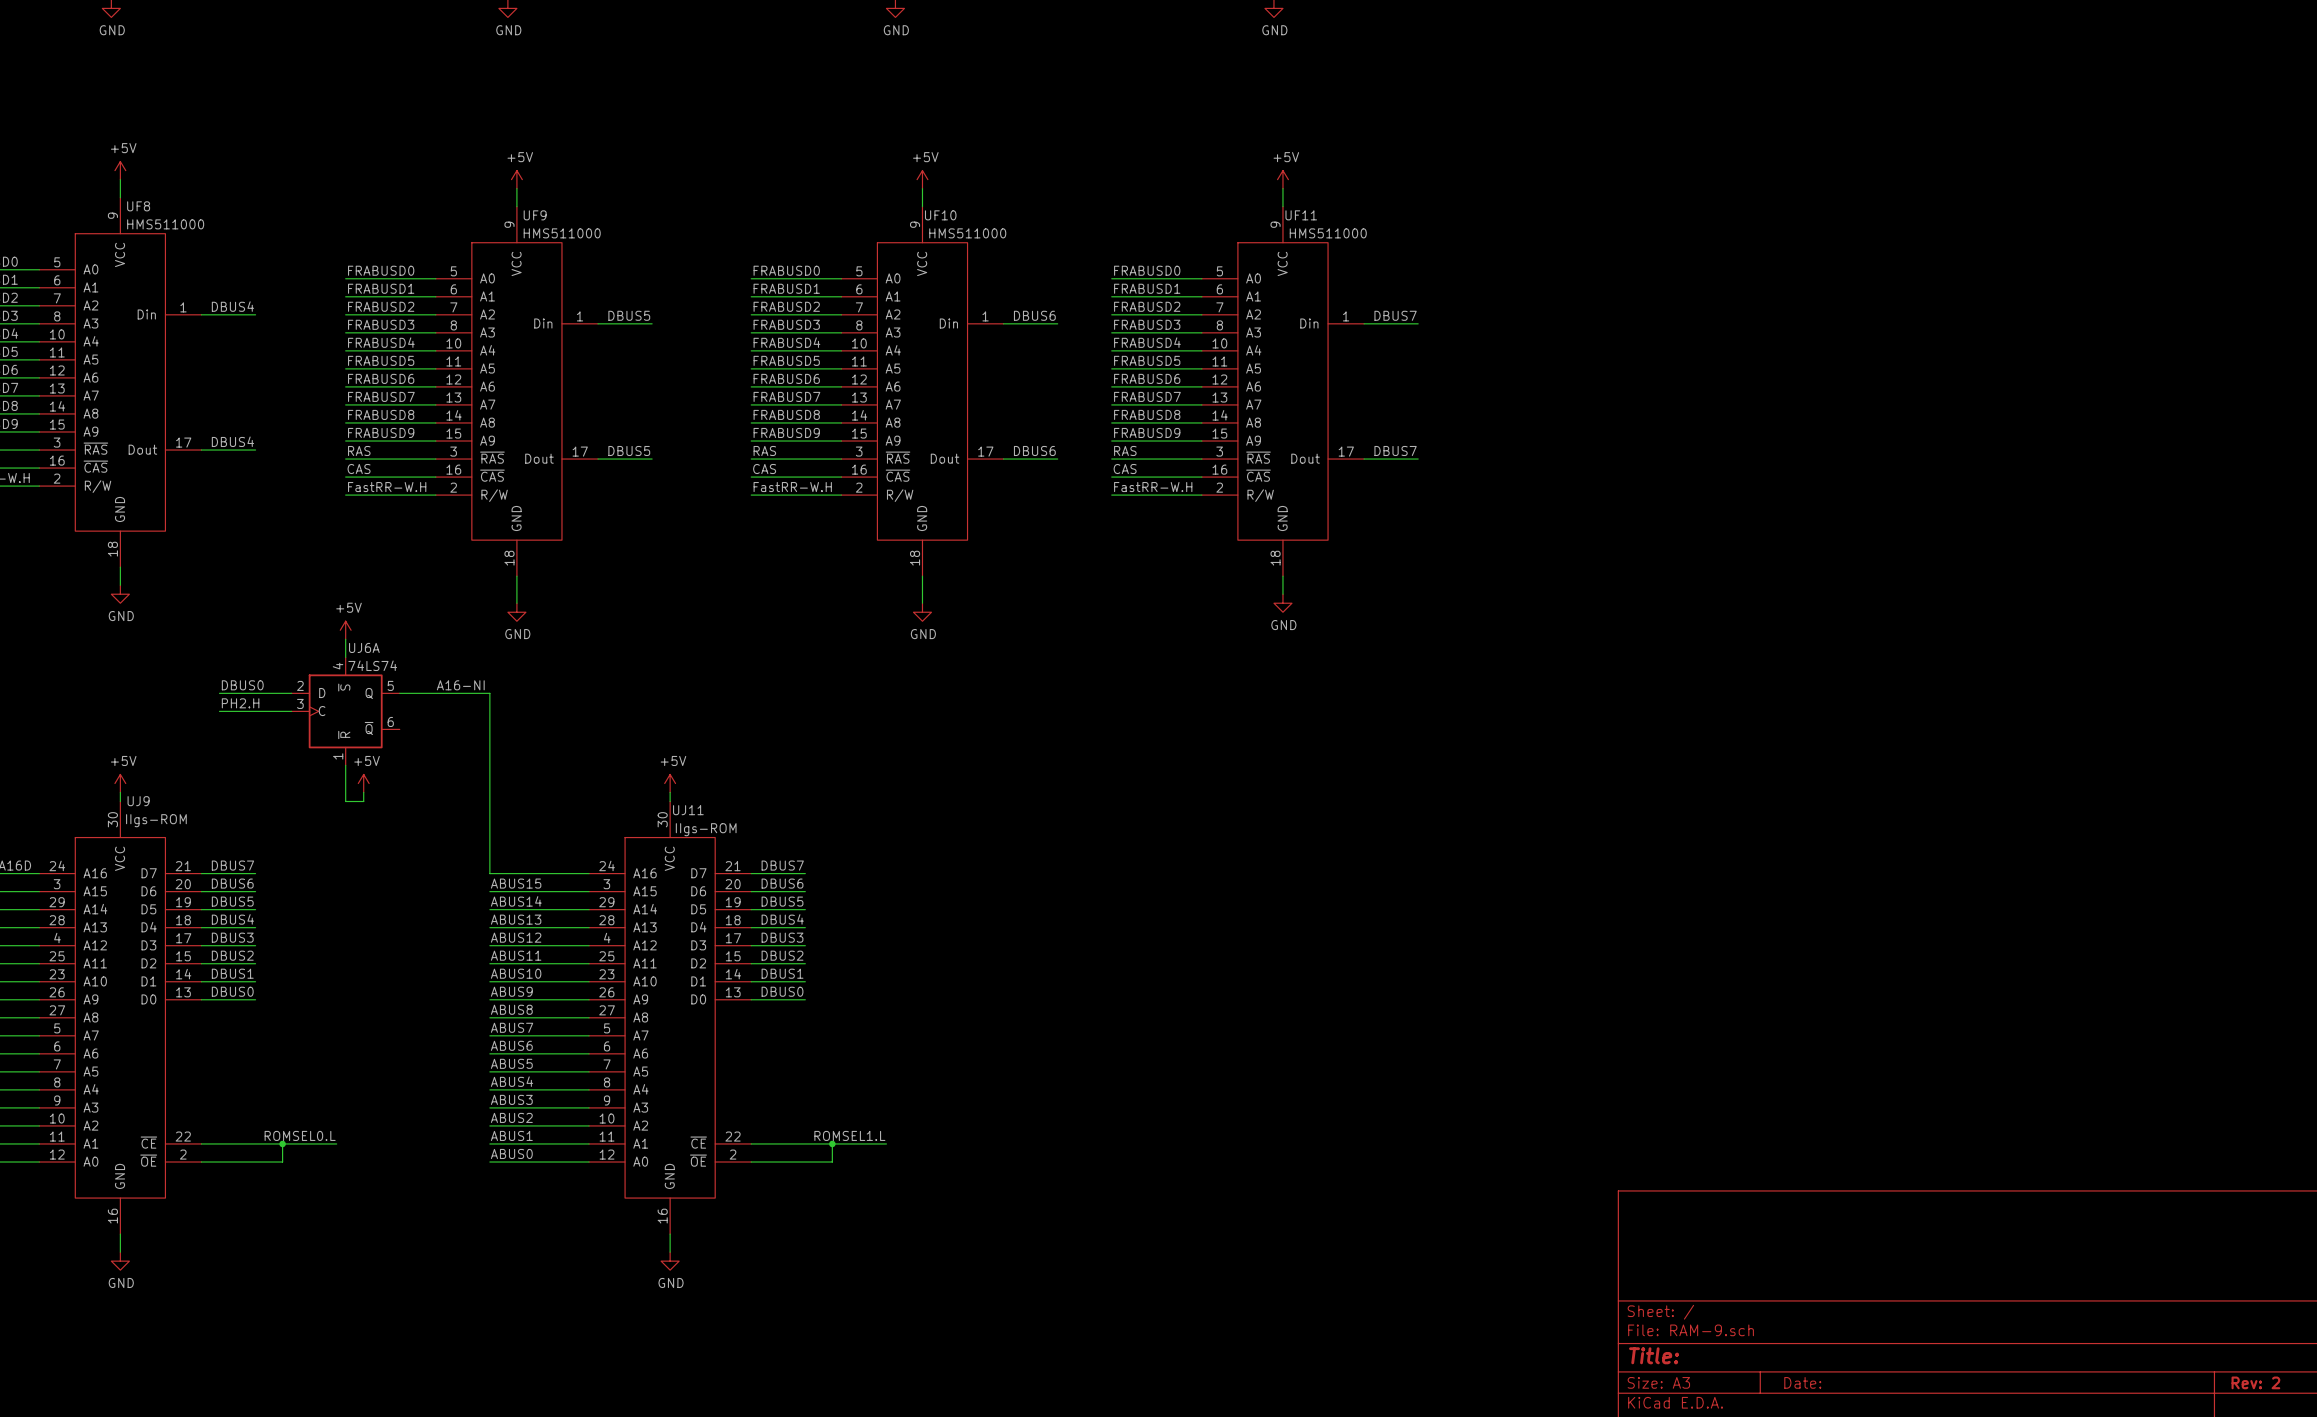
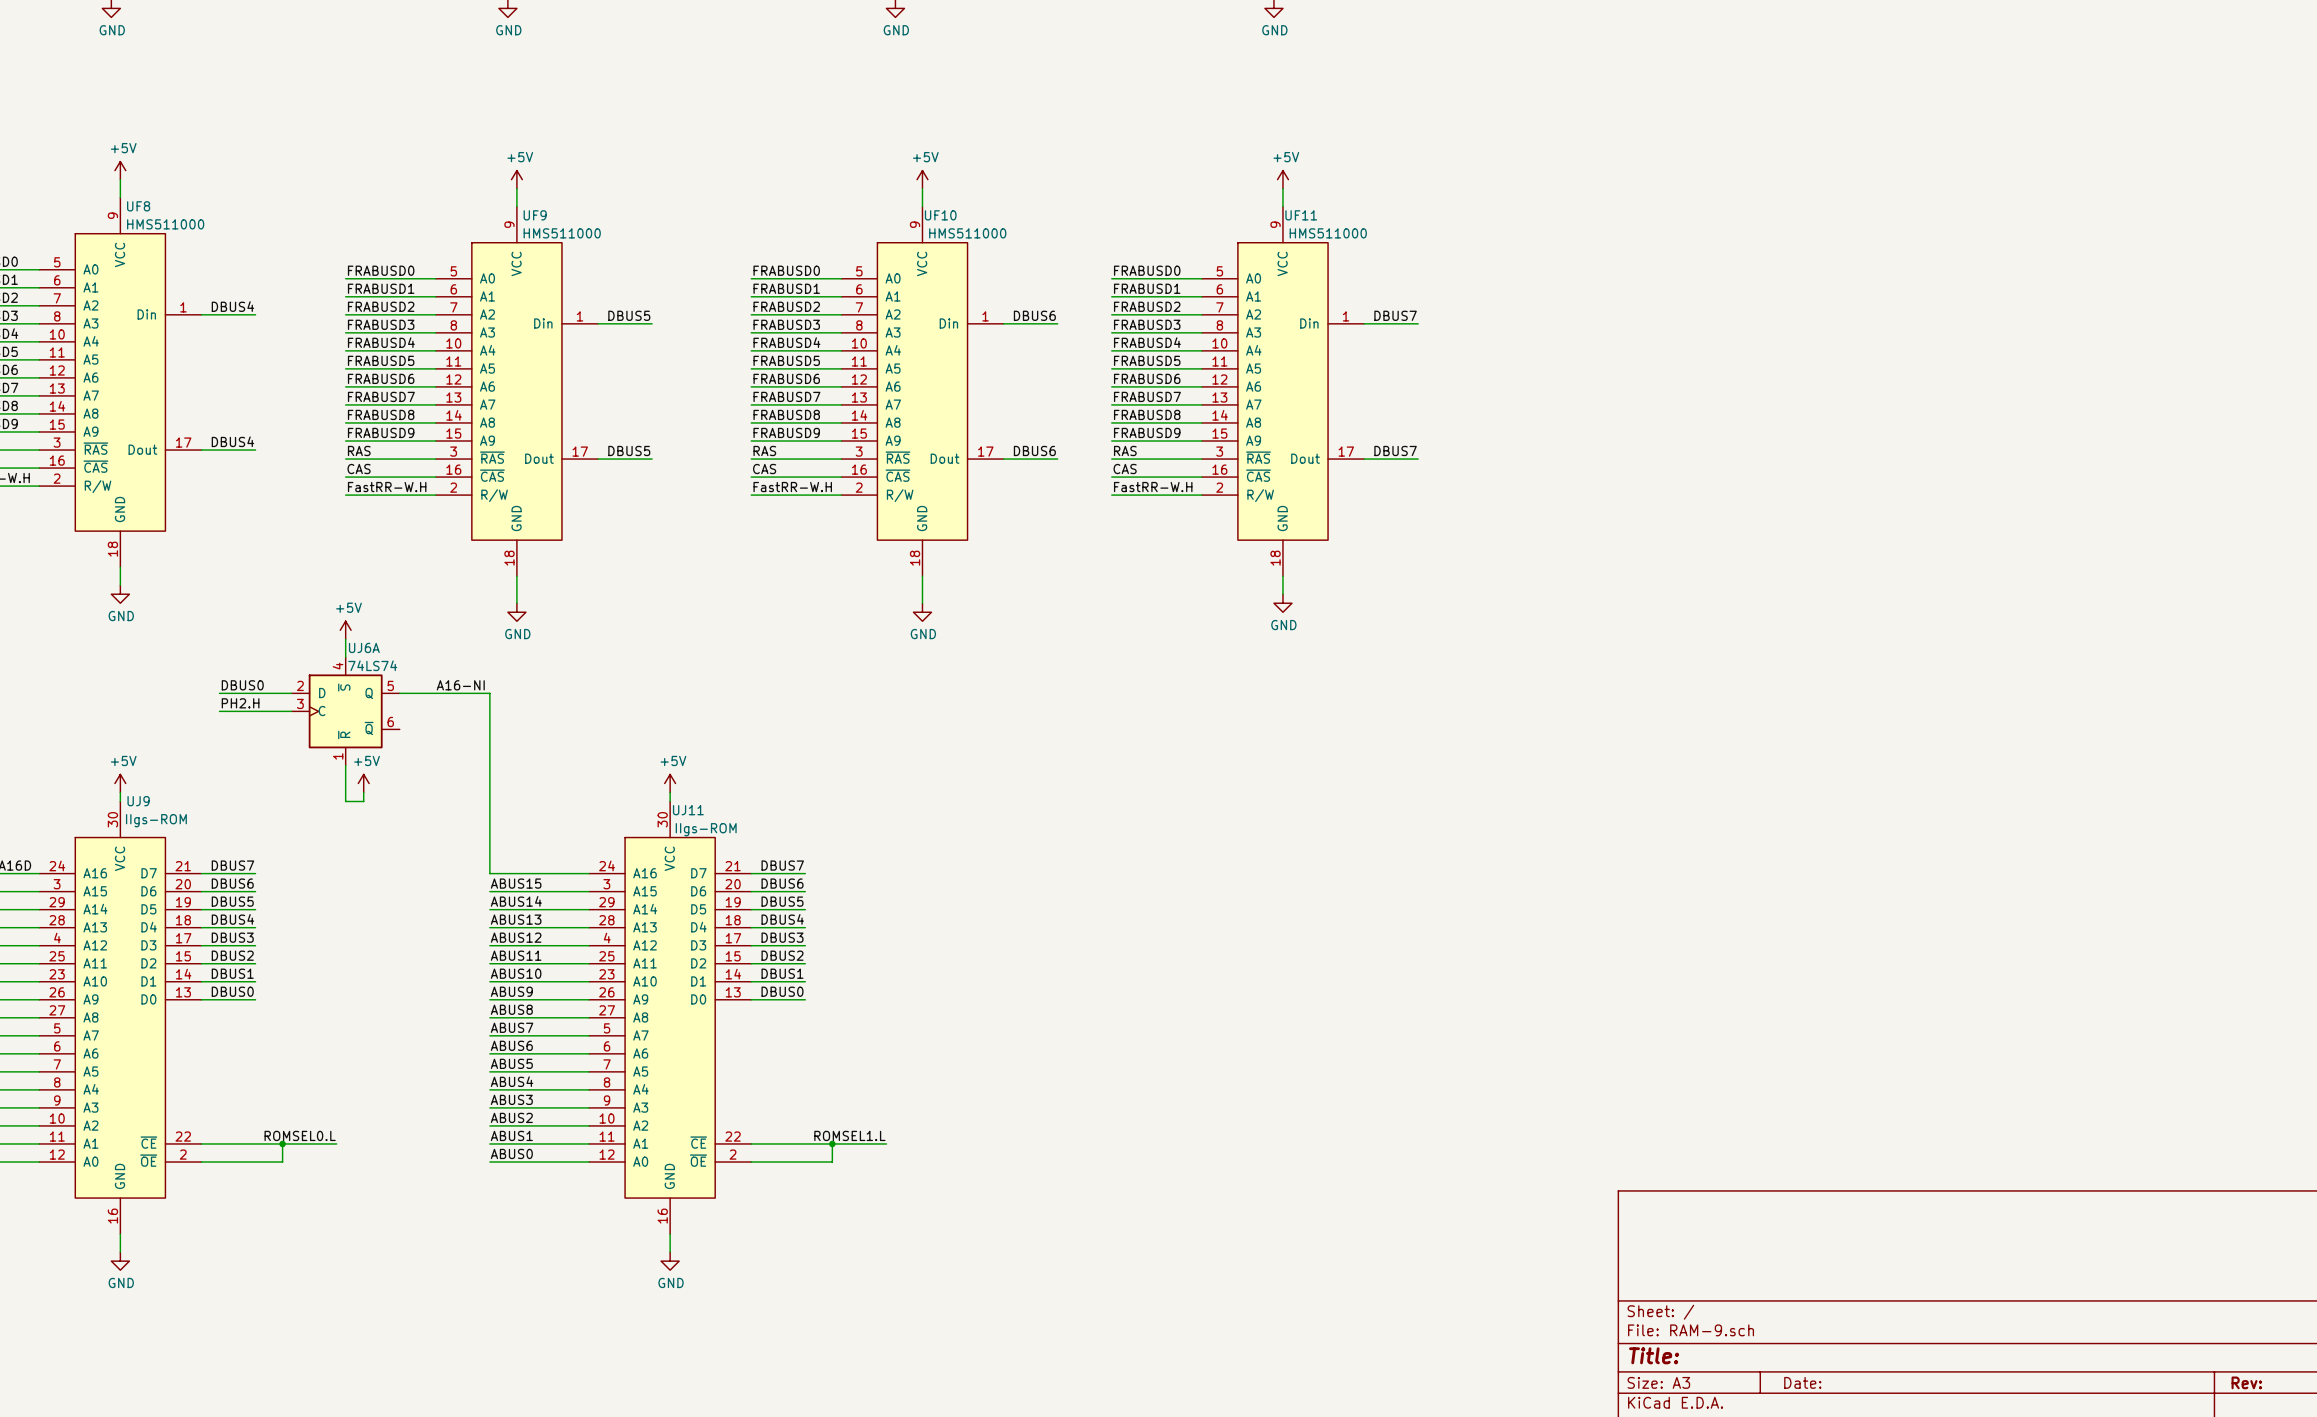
title block: Rev: 2 (2255, 1382) -> Rev: (2246, 1382)

